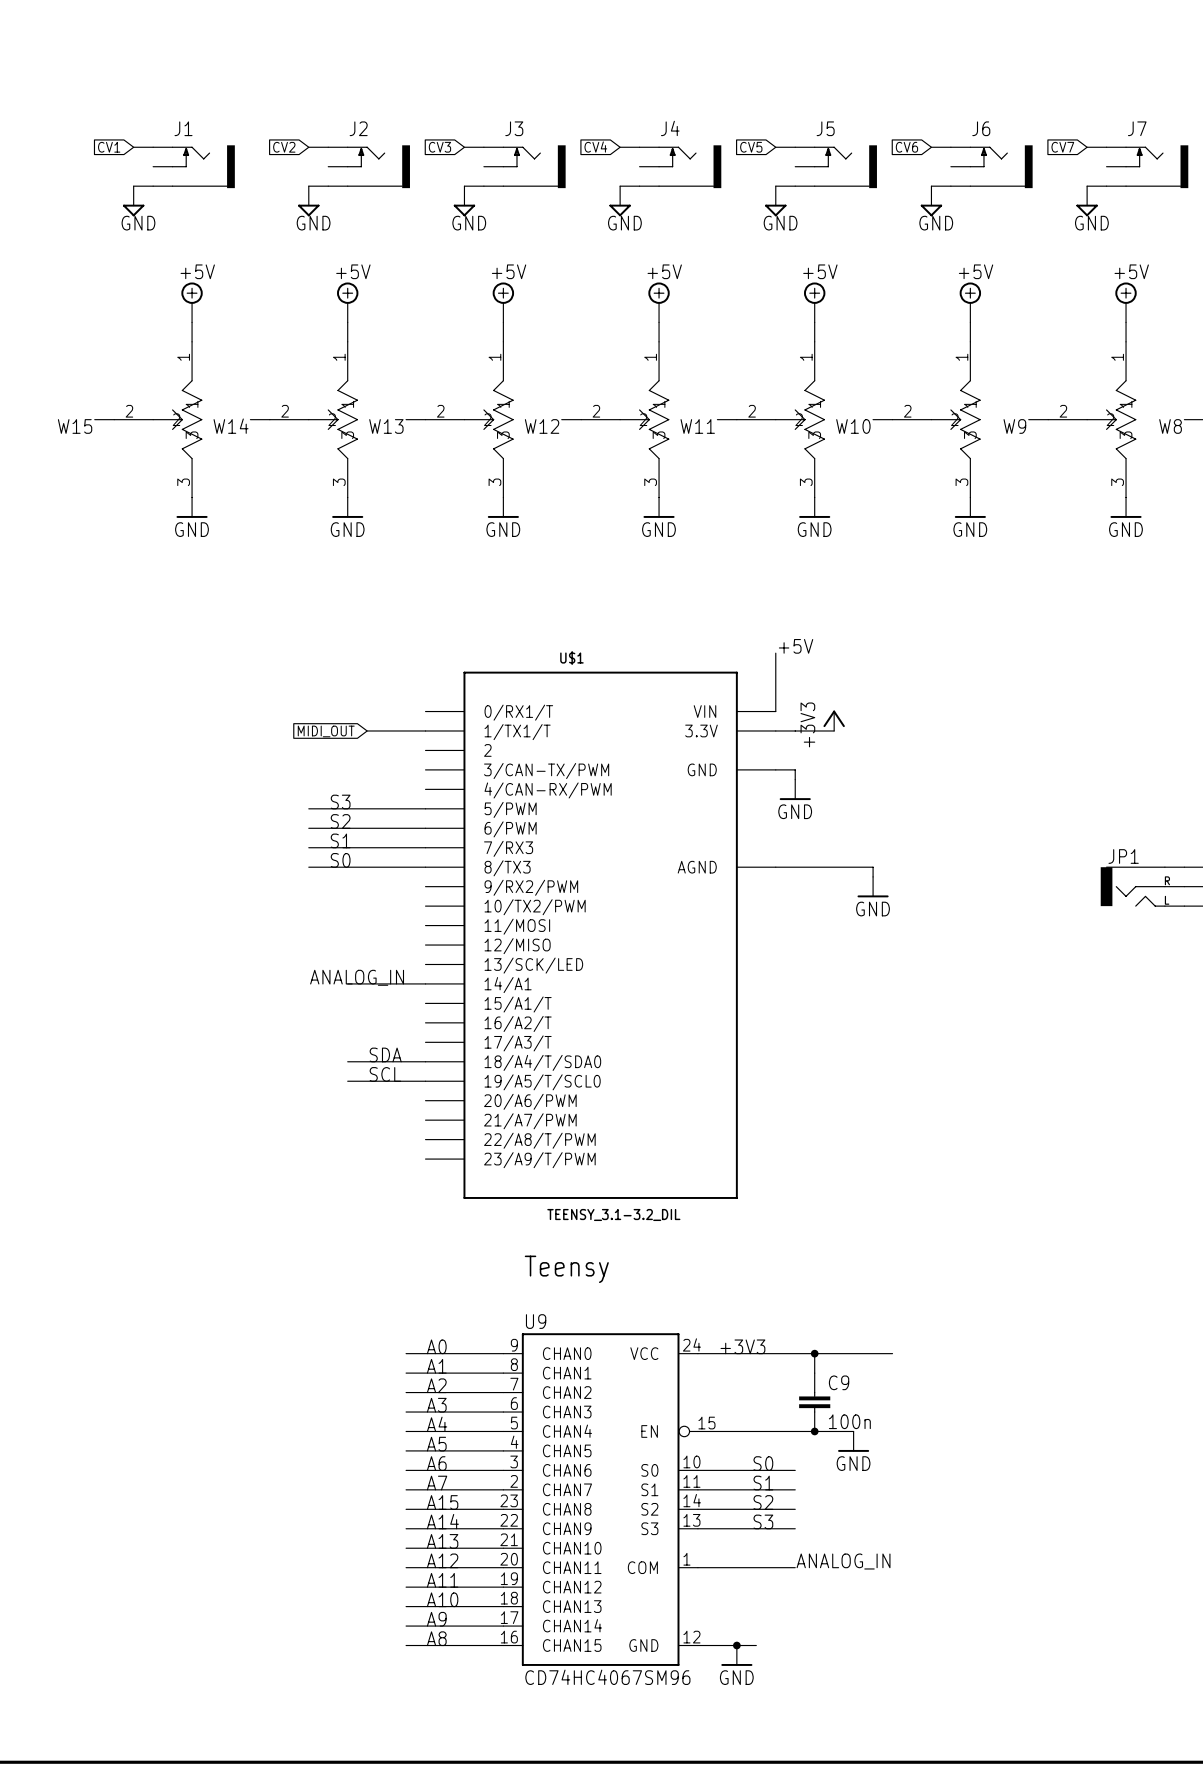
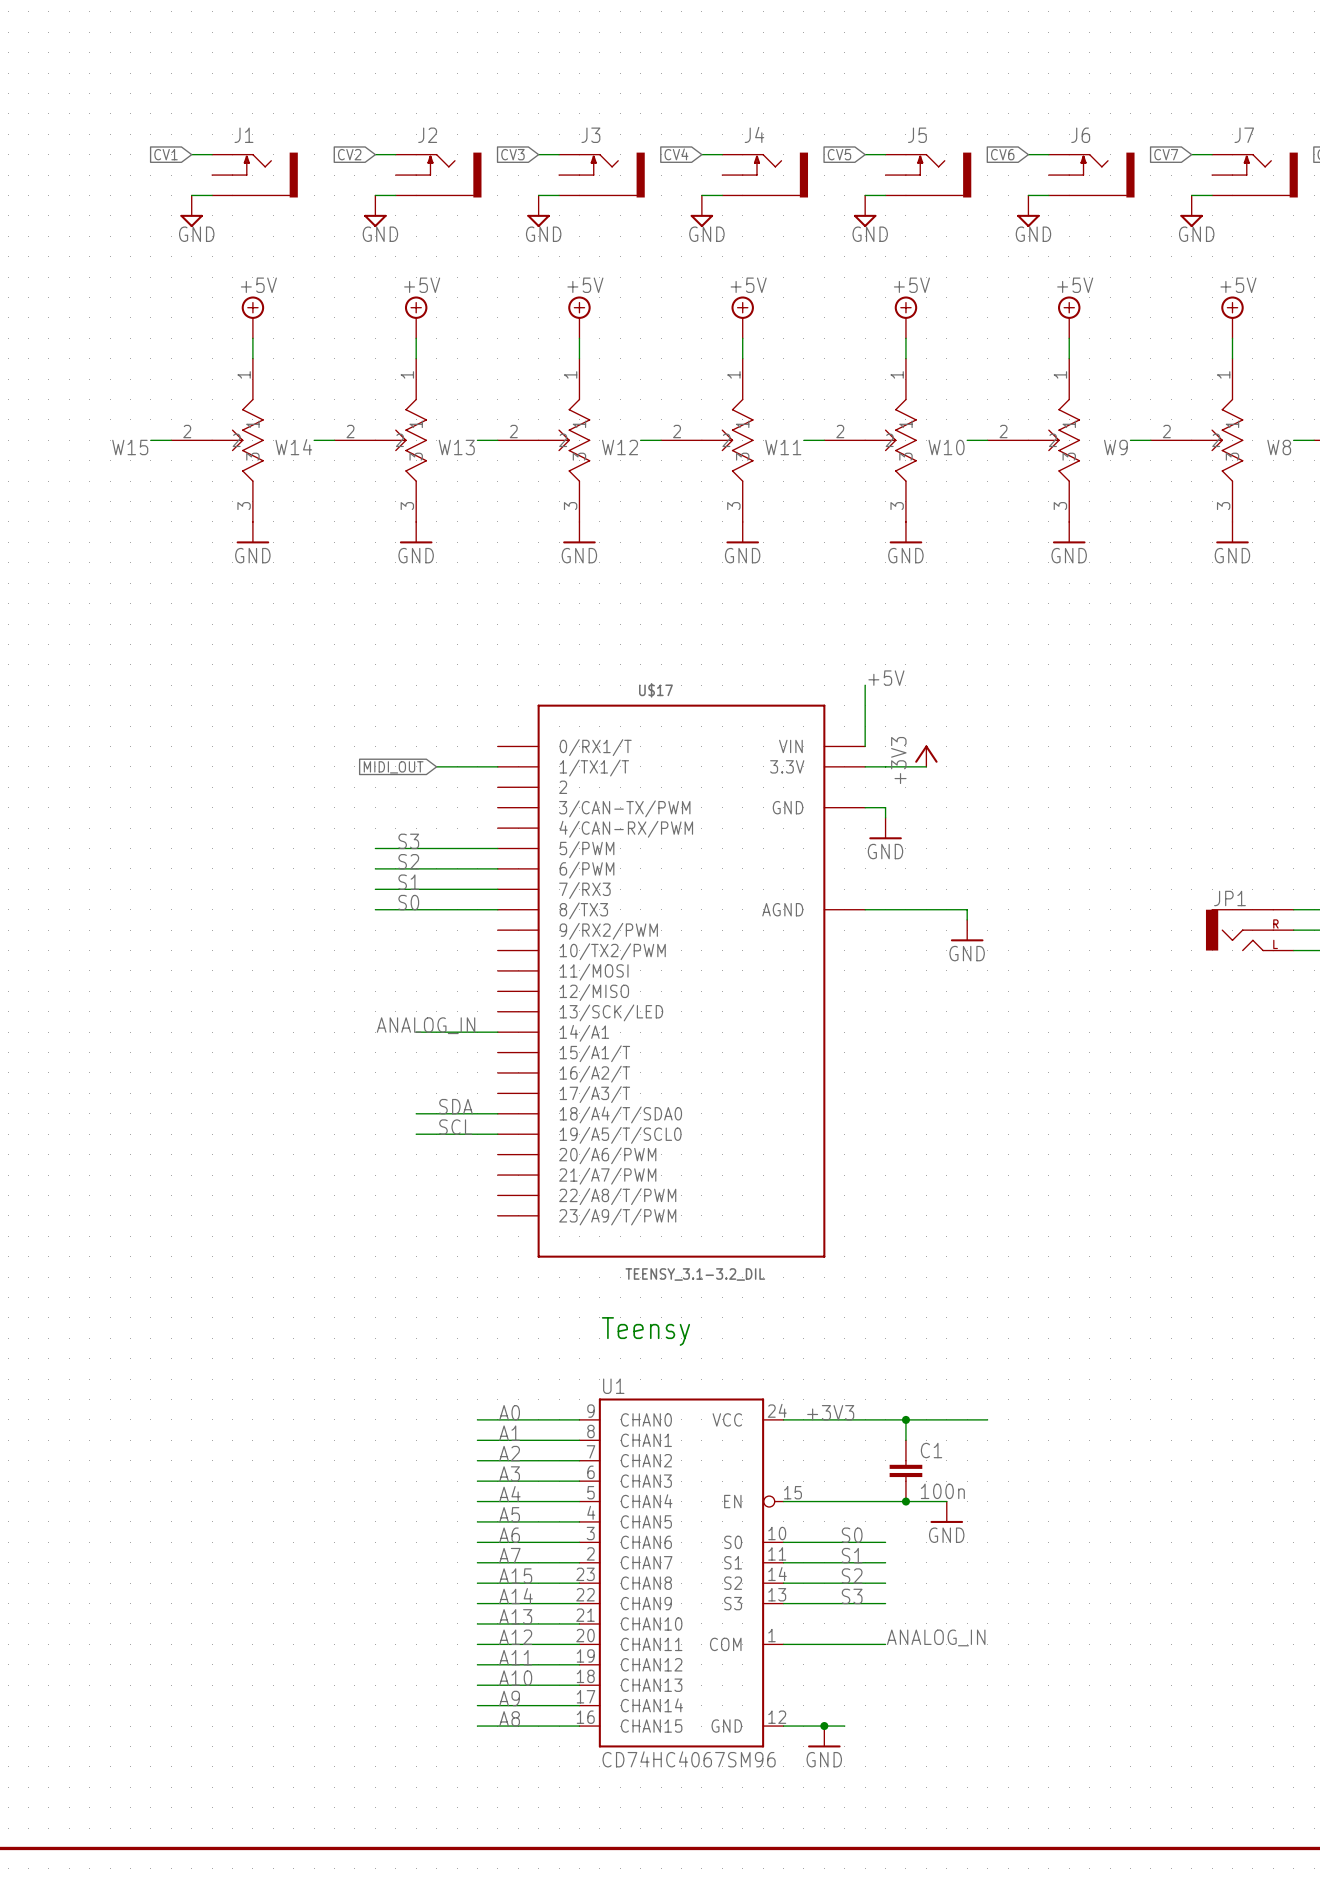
U$1 name: U$1 (571, 658) -> U$17 (655, 690)
U9 name: U9 (536, 1321) -> U1 (613, 1386)
C9 name: C9 (839, 1382) -> C1 (931, 1450)

